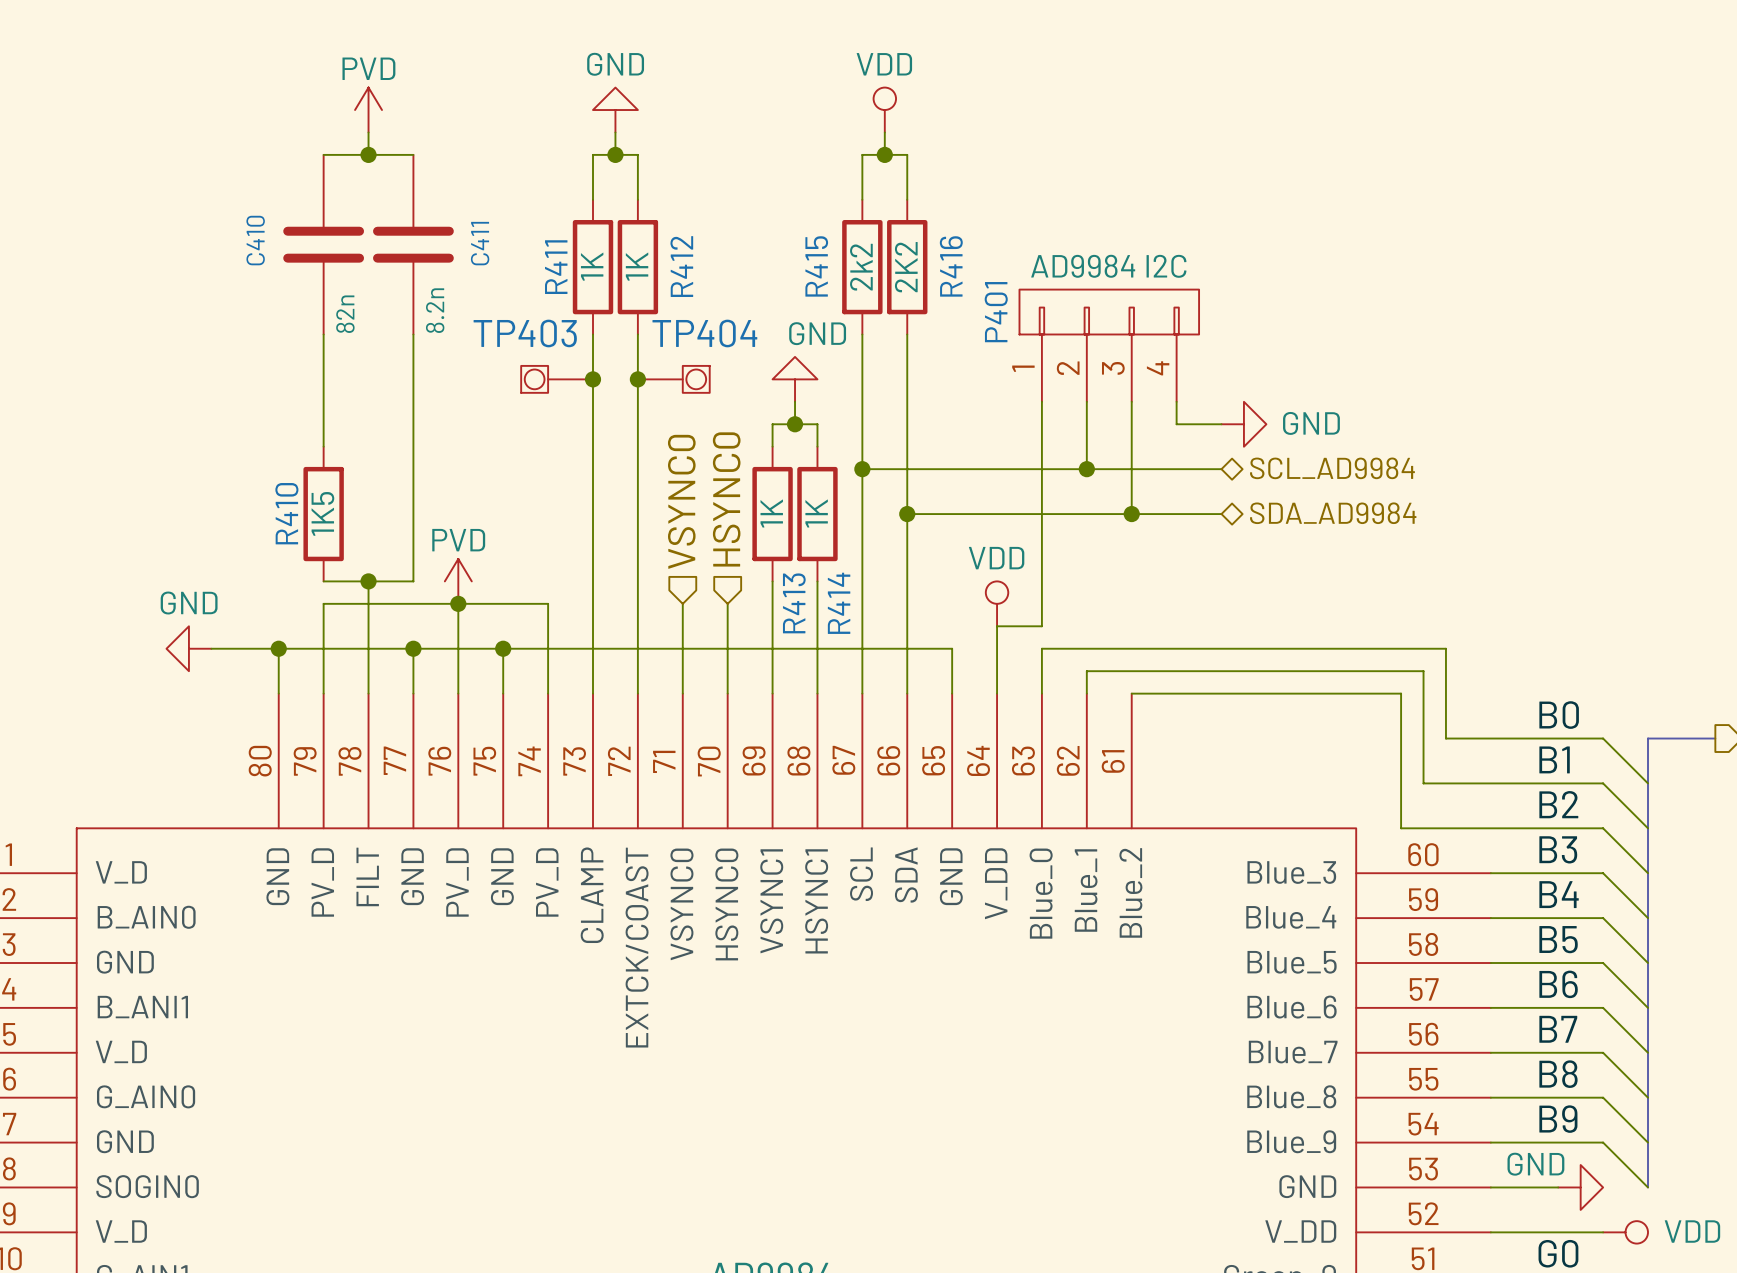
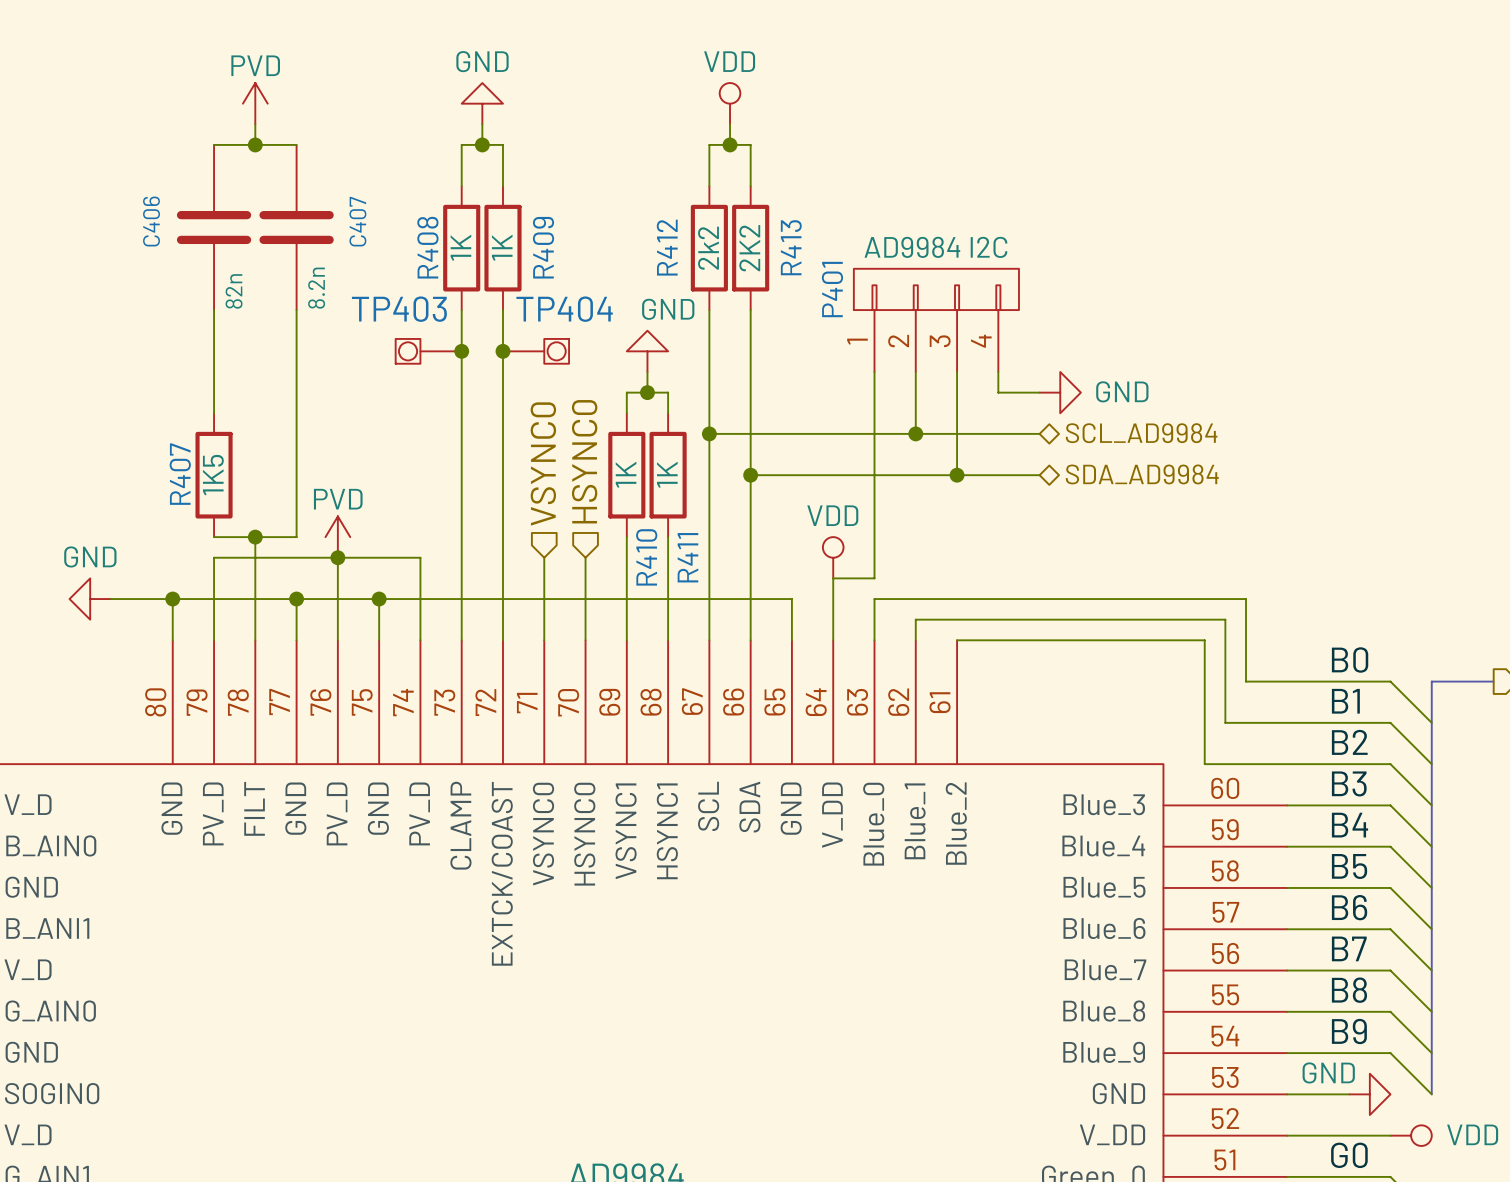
C410 name: C410 (255, 240) -> C406 (151, 221)
C411 name: C411 (480, 243) -> C407 (357, 221)
R412 name: R412 (681, 266) -> R409 (543, 247)
R415 name: R415 (816, 266) -> R412 (667, 247)
R416 name: R416 (951, 266) -> R413 (791, 247)
R411 name: R411 (556, 267) -> R408 (427, 247)
R410 name: R410 (286, 513) -> R407 (180, 474)
R413 name: R413 (794, 603) -> R410 (646, 557)
R414 name: R414 (839, 603) -> R411 (687, 557)

